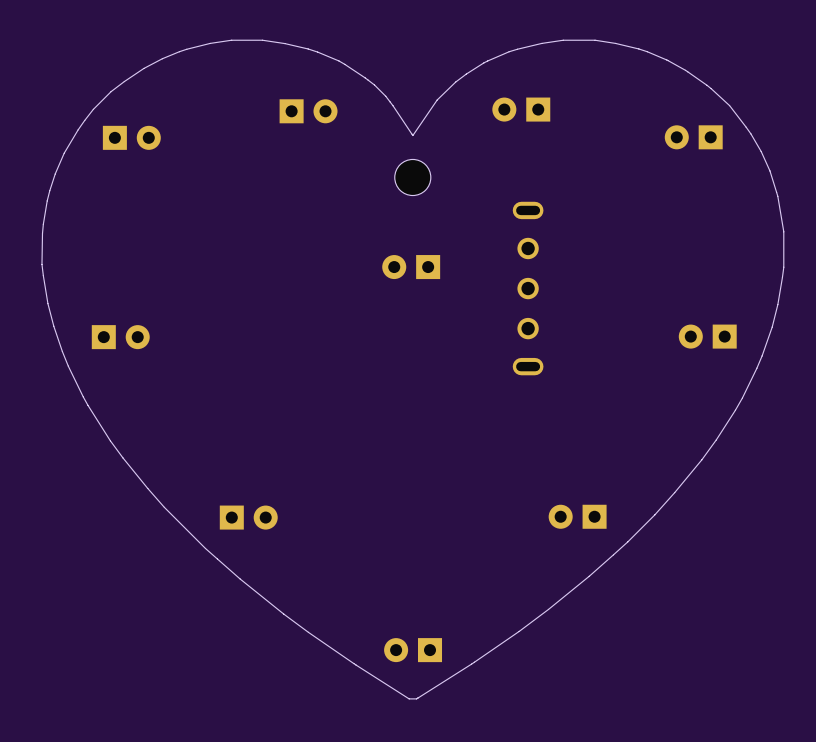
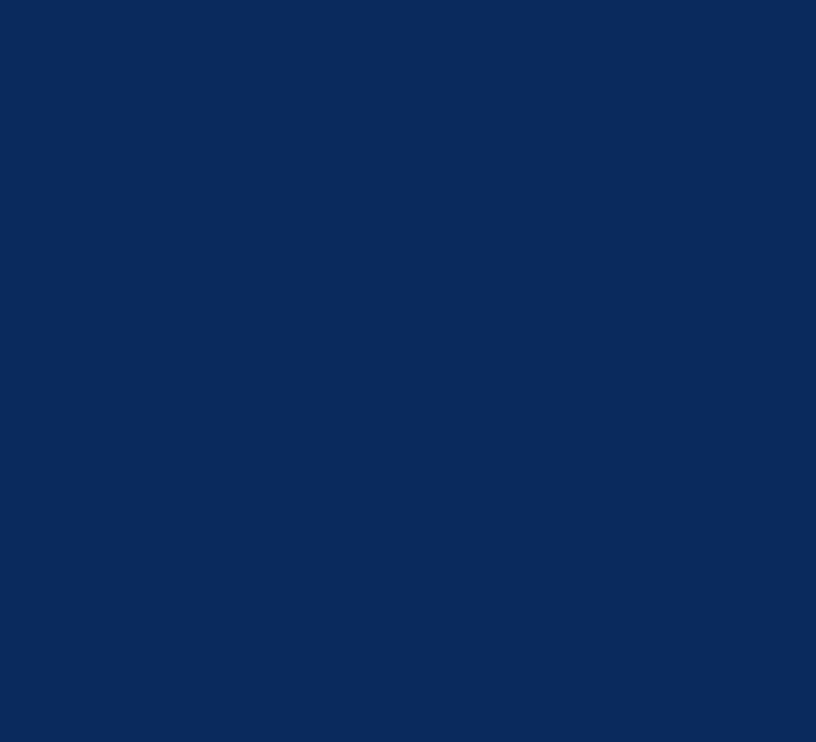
board edge: (595, 40) (647, 51) (685, 70) (711, 88) (729, 105) (750, 133) (769, 170) (777, 196) (783, 231) (783, 267) (772, 326) (756, 368) (735, 410) (701, 459) (654, 514) (589, 576) (519, 631) (416, 698) (409, 698) (308, 632) (240, 579) (205, 548) (164, 507) (110, 440) (87, 405) (68, 366) (47, 303) (41, 264) (43, 224) (49, 190) (64, 153) (93, 109) (111, 91) (143, 68) (186, 49) (231, 40) (262, 40) (317, 52) (338, 60) (374, 85) (390, 102) (412, 135) (437, 100) (455, 82) (483, 62) (509, 51) (541, 43) (563, 40) (595, 40) -> none
part: (521, 109) -> none
part: (308, 111) -> none
part: (131, 137) -> none
part: (693, 137) -> none
part: (412, 177) -> none
part: (411, 267) -> none
part: (528, 288) -> none
part: (707, 336) -> none
part: (120, 337) -> none
part: (577, 516) -> none
part: (248, 517) -> none
part: (413, 650) -> none

